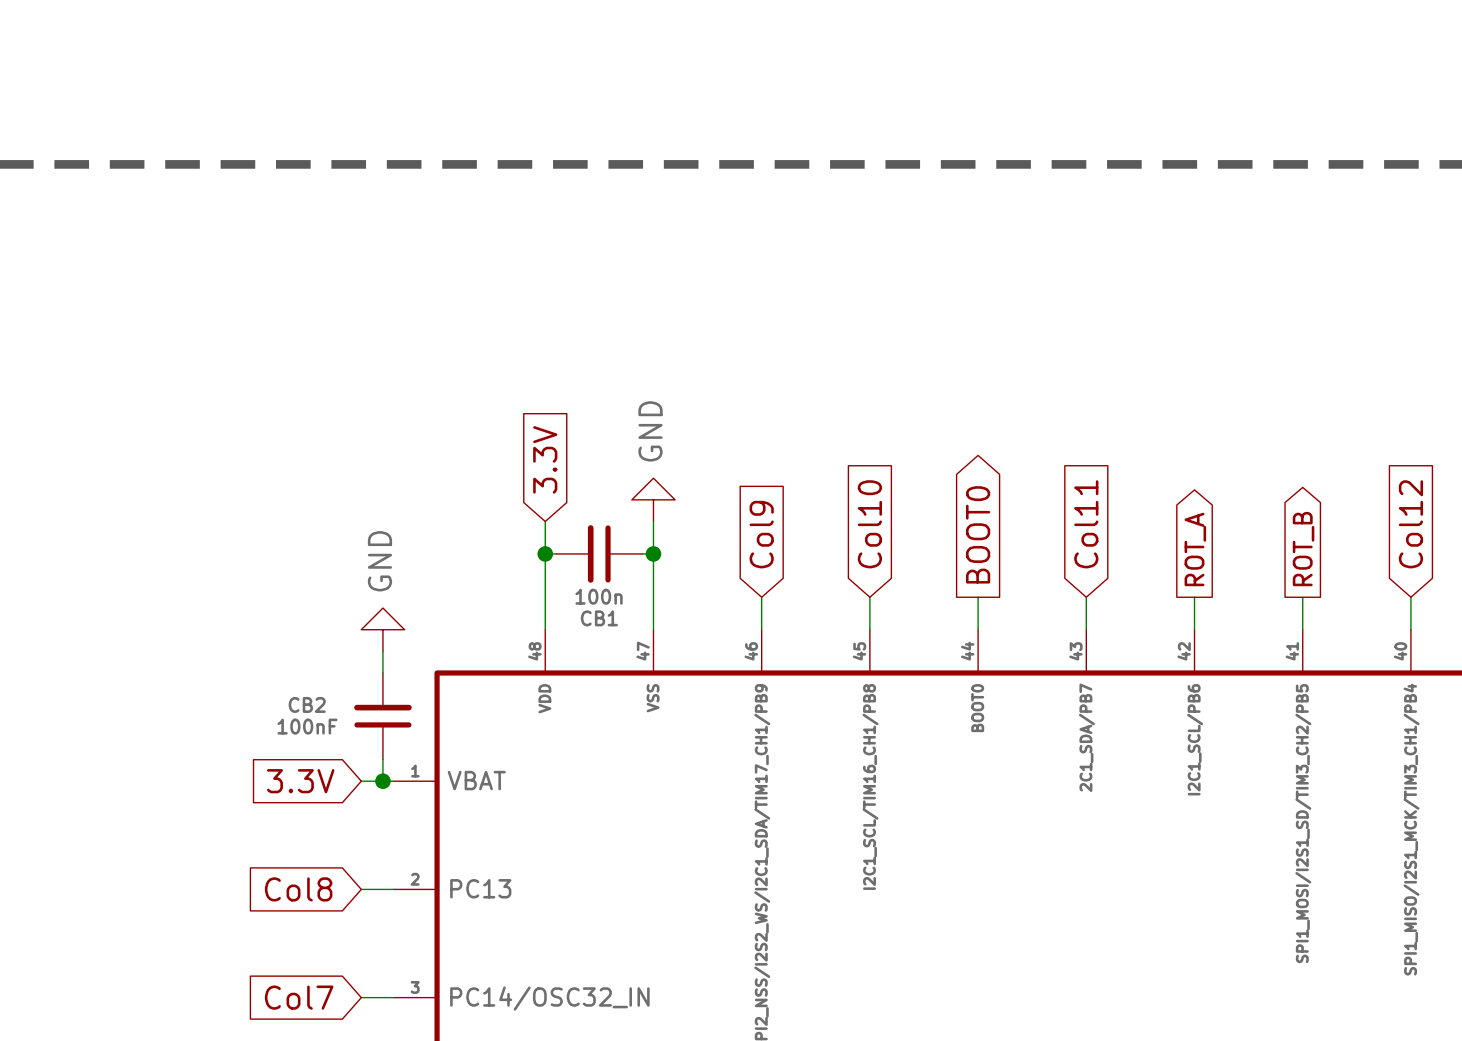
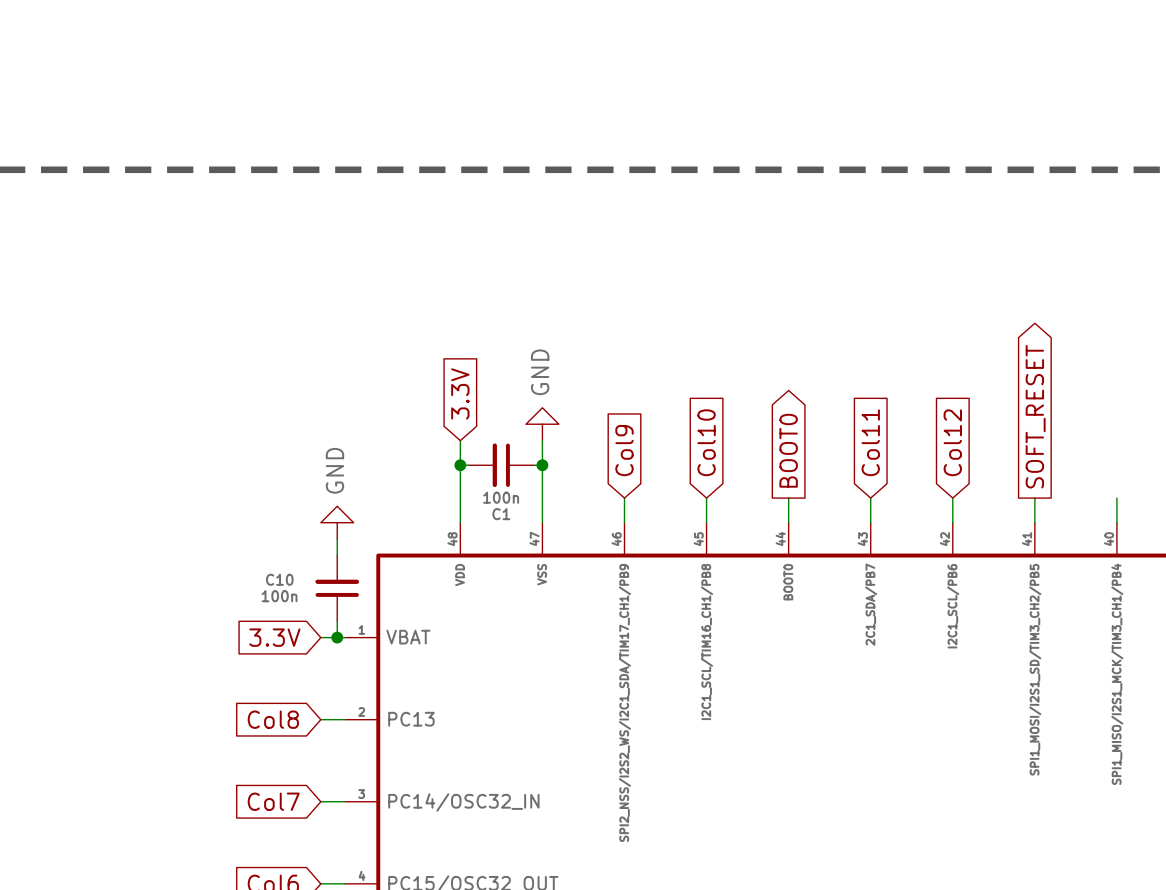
global label: Col12 (1410, 524) -> none
global label shape: output (1195, 549) -> input (952, 442)
global label: ROT_A (1195, 549) -> Col12 (952, 442)
global label: ROT_B (1303, 549) -> SOFT_RESET (1035, 416)
CB1 name: CB1 (599, 618) -> C1 (501, 514)
CB2 name: CB2 (307, 704) -> C10 (279, 579)
CB2 value: 100nF (307, 726) -> 100n (279, 596)

